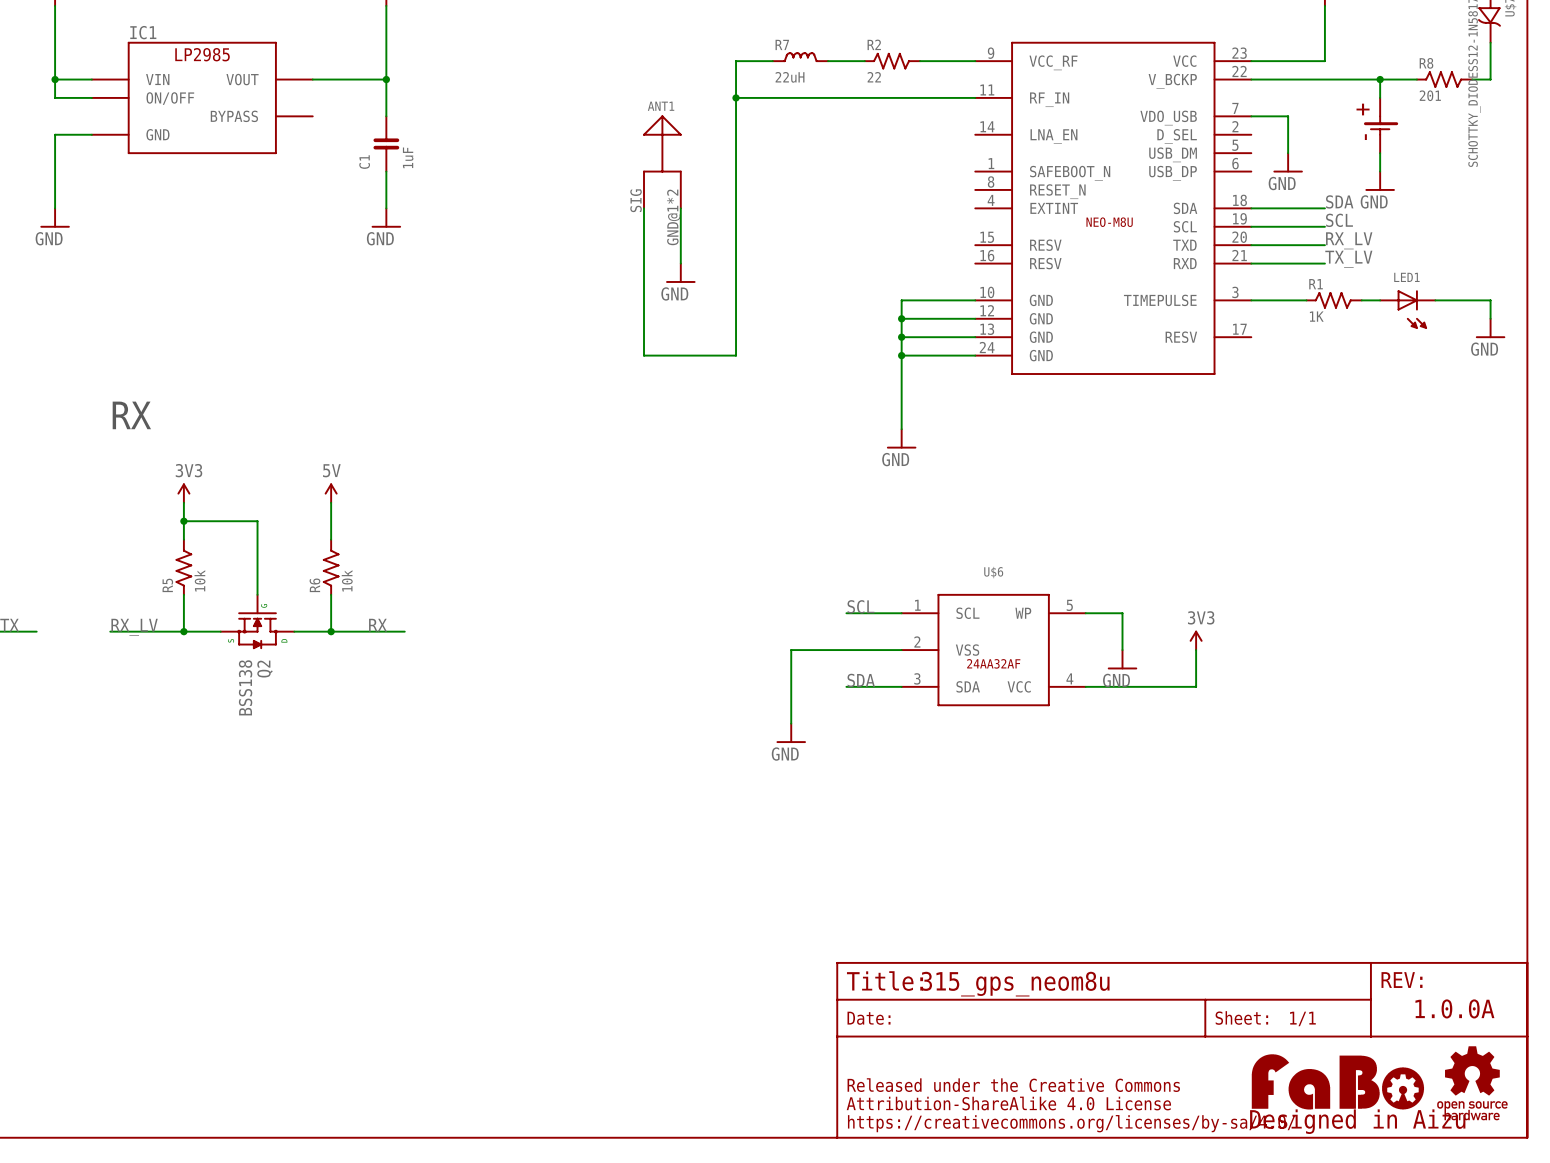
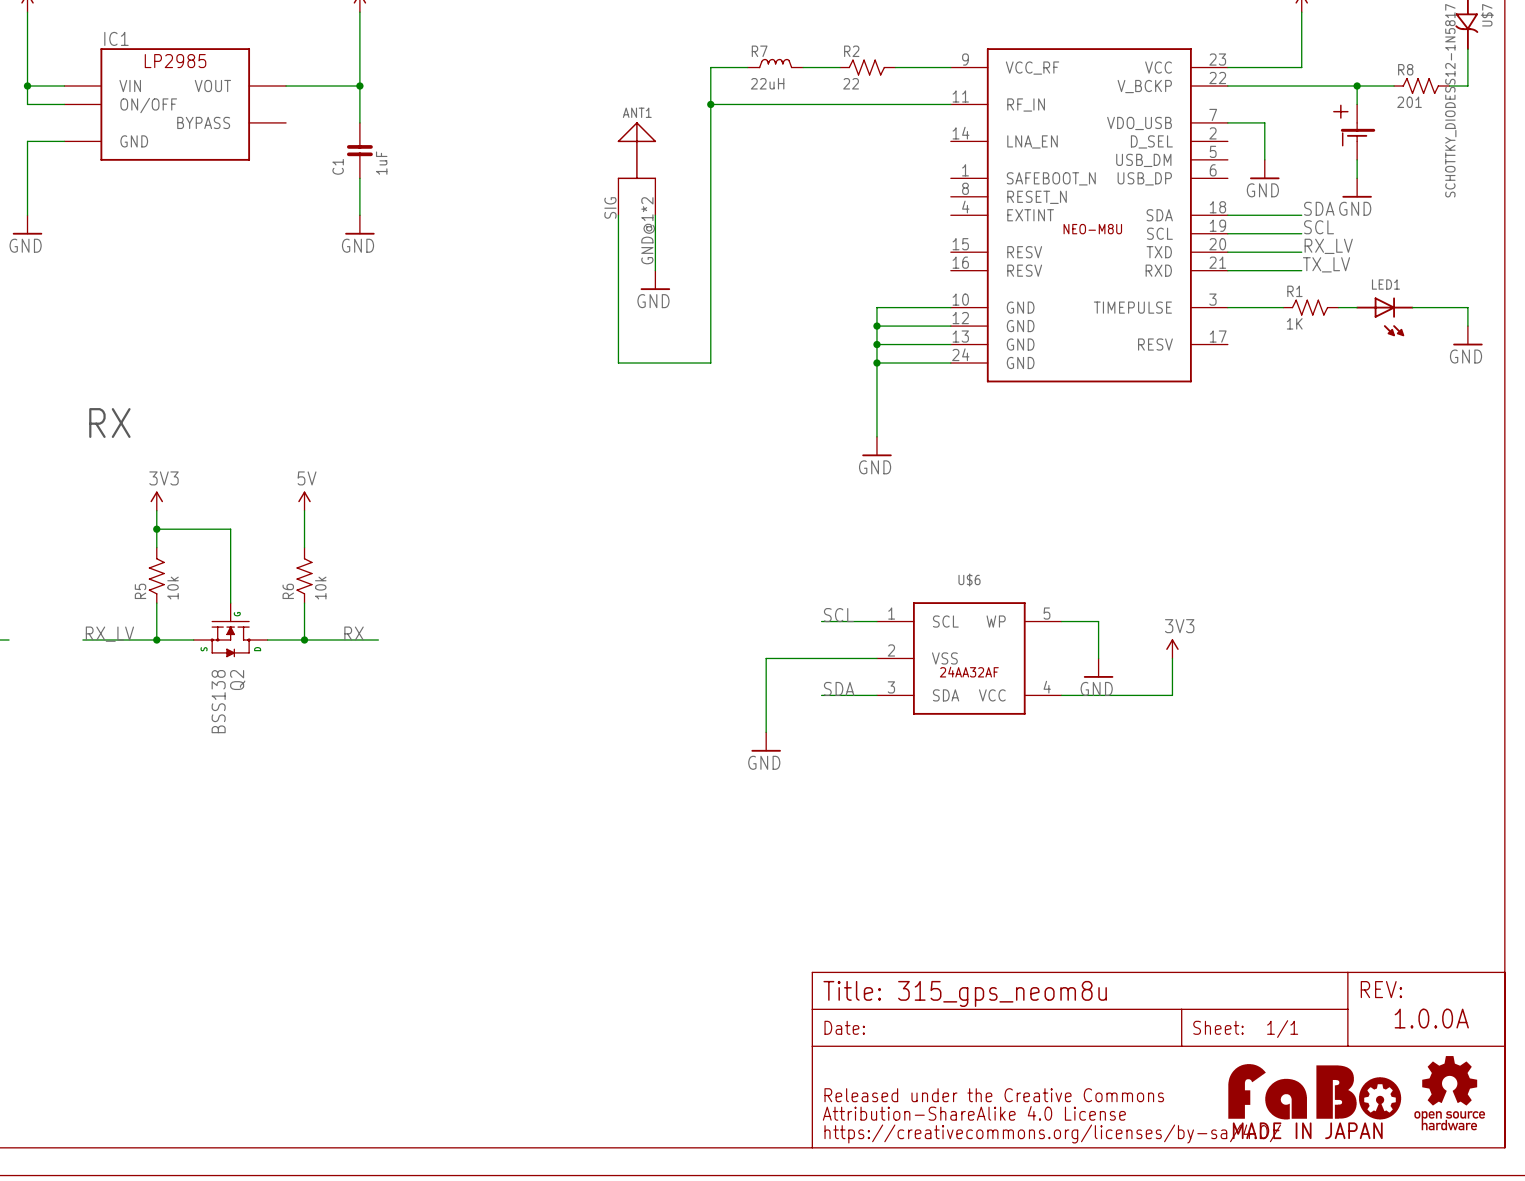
part text: none -> MADE IN JAPAN (1307, 1130)
part text: Designed in Aizu (1357, 1121) -> none

